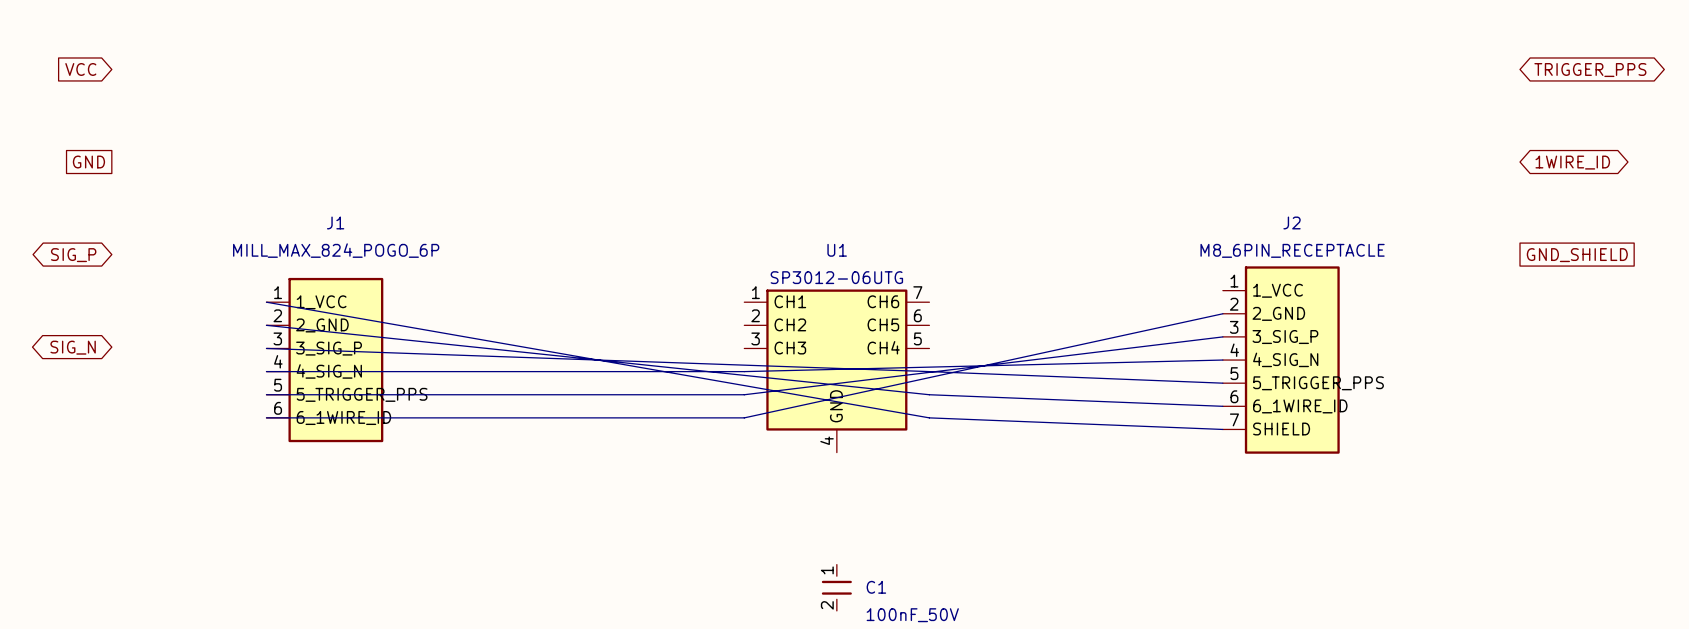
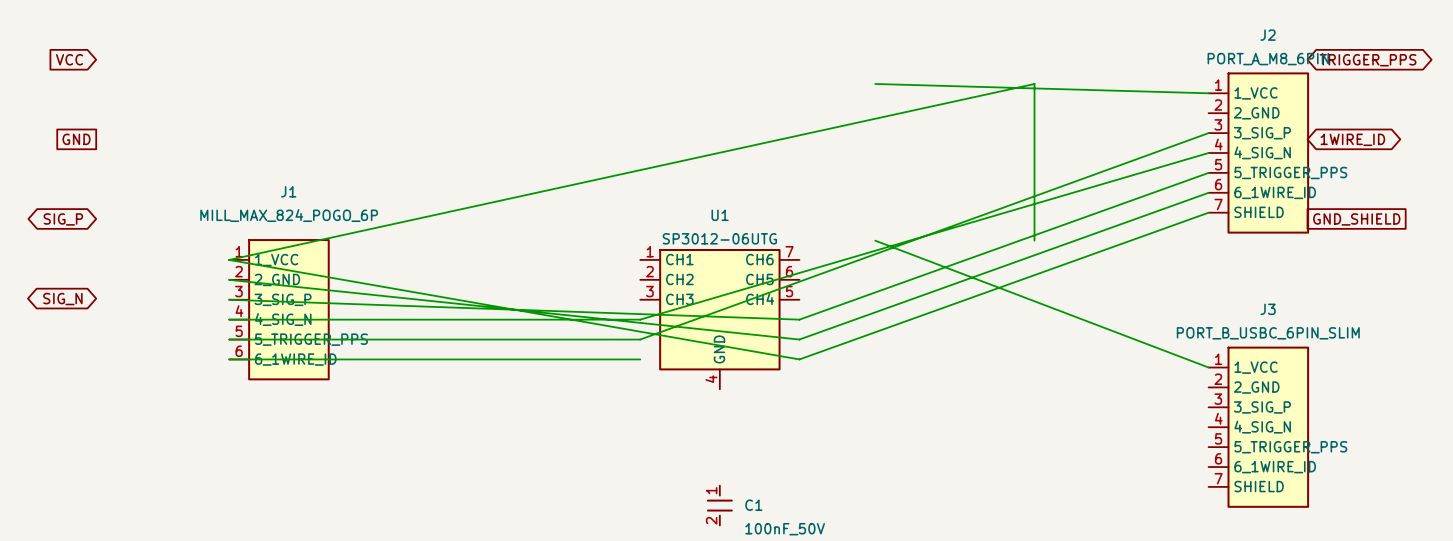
wire: none -> (875, 83) (1208, 93)
J2 value: M8_6PIN_RECEPTACLE (1292, 250) -> PORT_A_M8_6PIN (1268, 59)
wire: none -> (875, 240) (1208, 367)
wire: none -> (1034, 240) (1034, 83) (229, 259)
wire: (1222, 313) (744, 417) -> none
wire: (1222, 336) (744, 394) -> (1208, 133) (640, 339)
wire: (1222, 360) (744, 371) -> (1208, 153) (640, 319)
J2 position: (1281, 360) -> (1258, 153)
wire: (929, 371) (1222, 383) -> (799, 319) (1208, 172)
wire: (929, 394) (1222, 406) -> (799, 339) (1208, 192)
wire: (929, 417) (1222, 429) -> (799, 359) (1208, 212)
J3: none -> PORT_B_USBC_6PIN_SLIM (1258, 427)

